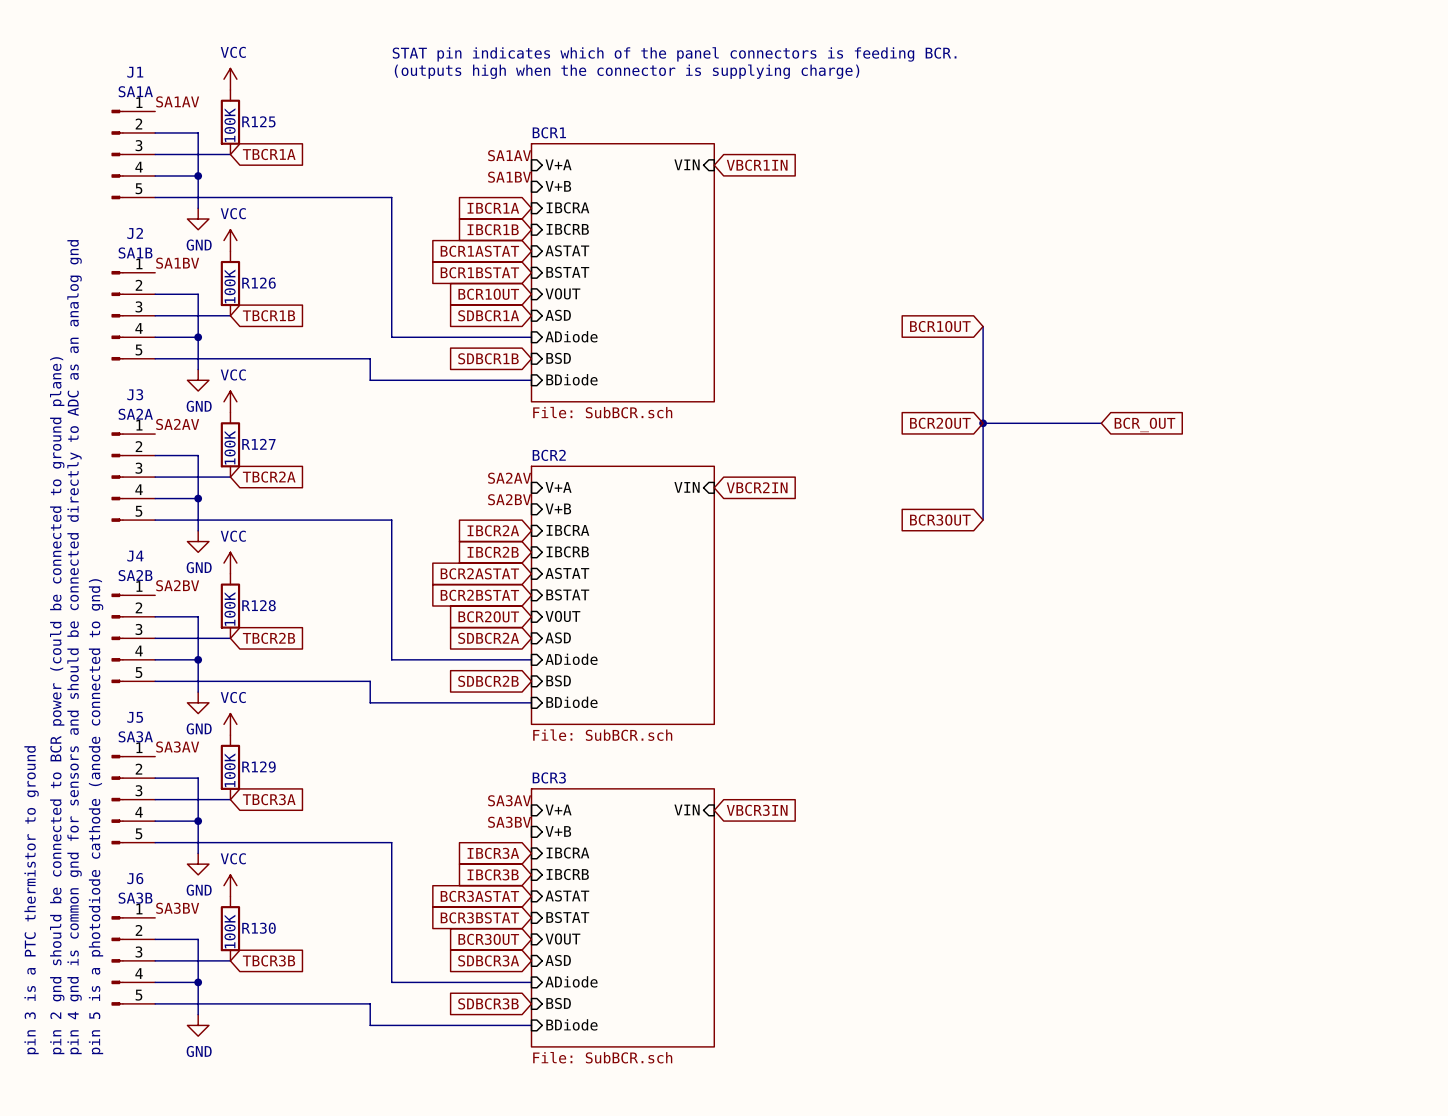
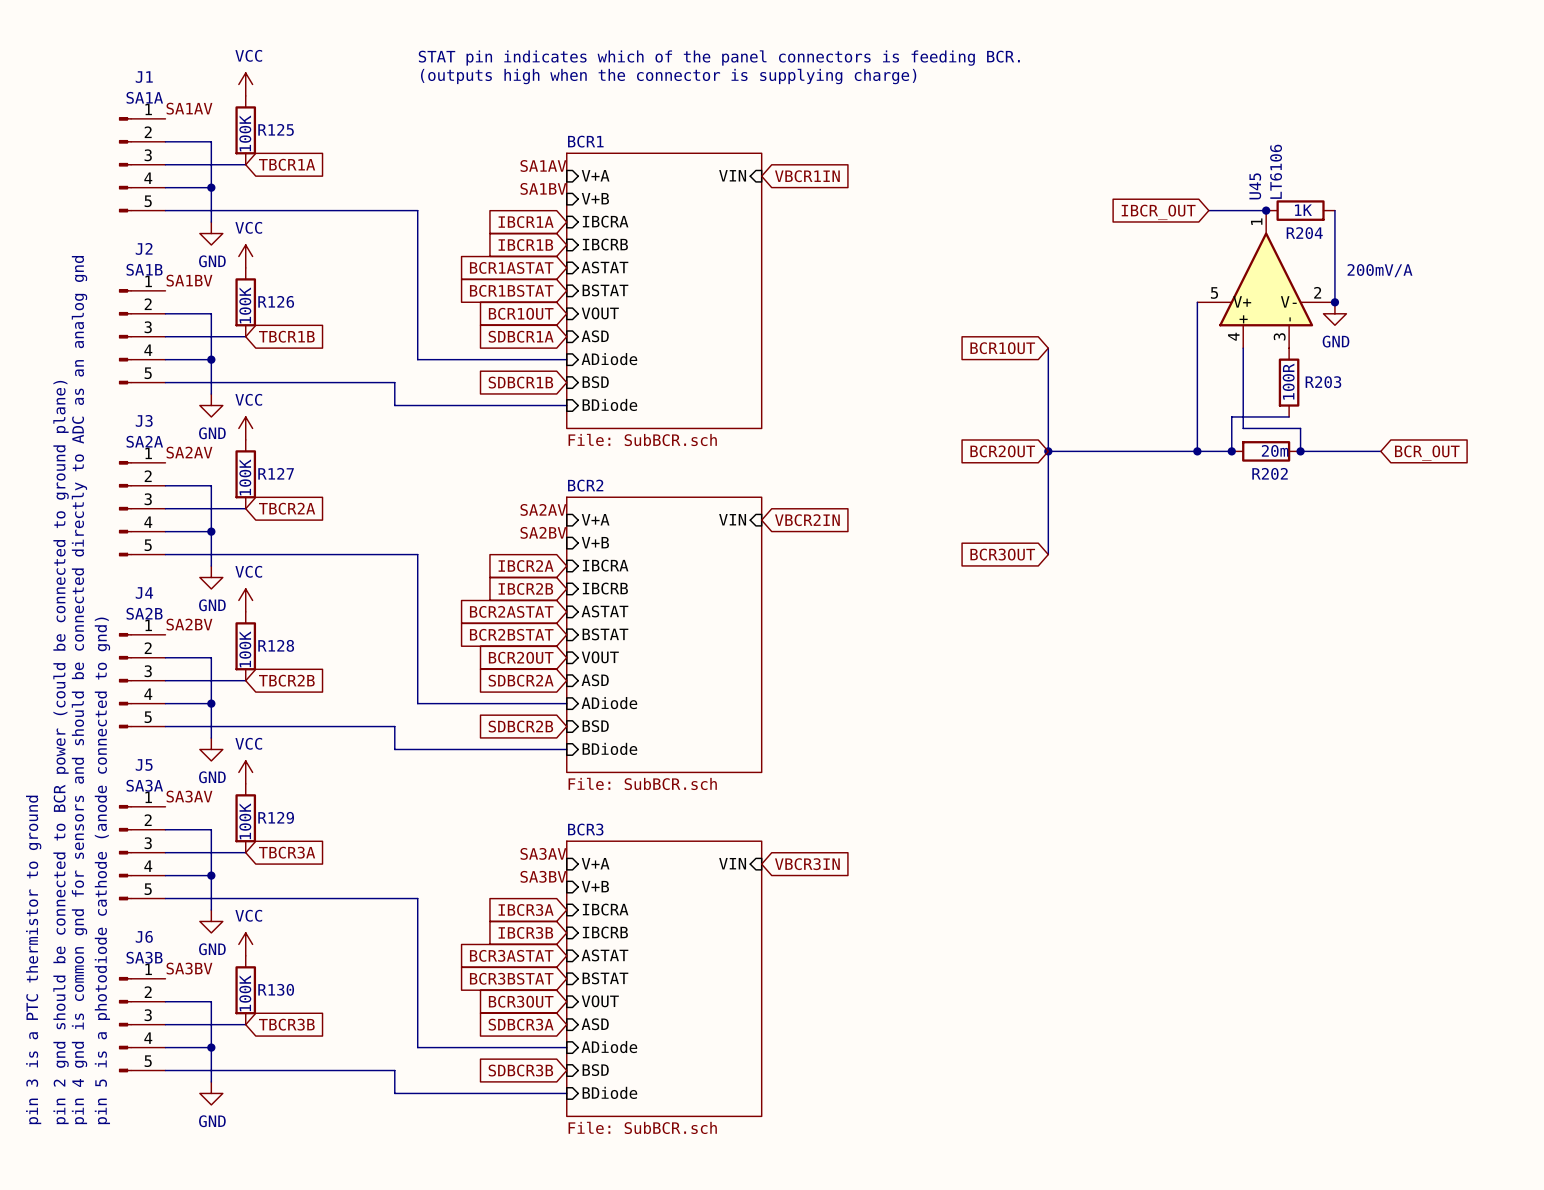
wire: none -> (1208, 210) (1266, 210)
junction: none -> (1266, 210)
R204: none -> 1K (1300, 210)
wire: none -> (1334, 210) (1334, 302)
global label: none -> IBCR_OUT (1158, 212)
text: none -> 200mV/A (1380, 270)
U45: none -> LT6106 (1266, 279)
wire: none -> (1197, 302) (1197, 451)
junction: none -> (1334, 302)
power symbol: none -> GND (1334, 313)
wire: none -> (1243, 348) (1243, 428) (1300, 428) (1300, 451) (1380, 451)
R203: none -> 100R (1289, 382)
wire: none -> (1289, 416) (1231, 416) (1231, 451) (1174, 451)
junction: none -> (1197, 451)
junction: none -> (1231, 451)
R202: none -> 20m (1266, 451)
junction: none -> (1300, 451)
global label position: BCR_OUT (1144, 424) -> BCR_OUT (1427, 453)

